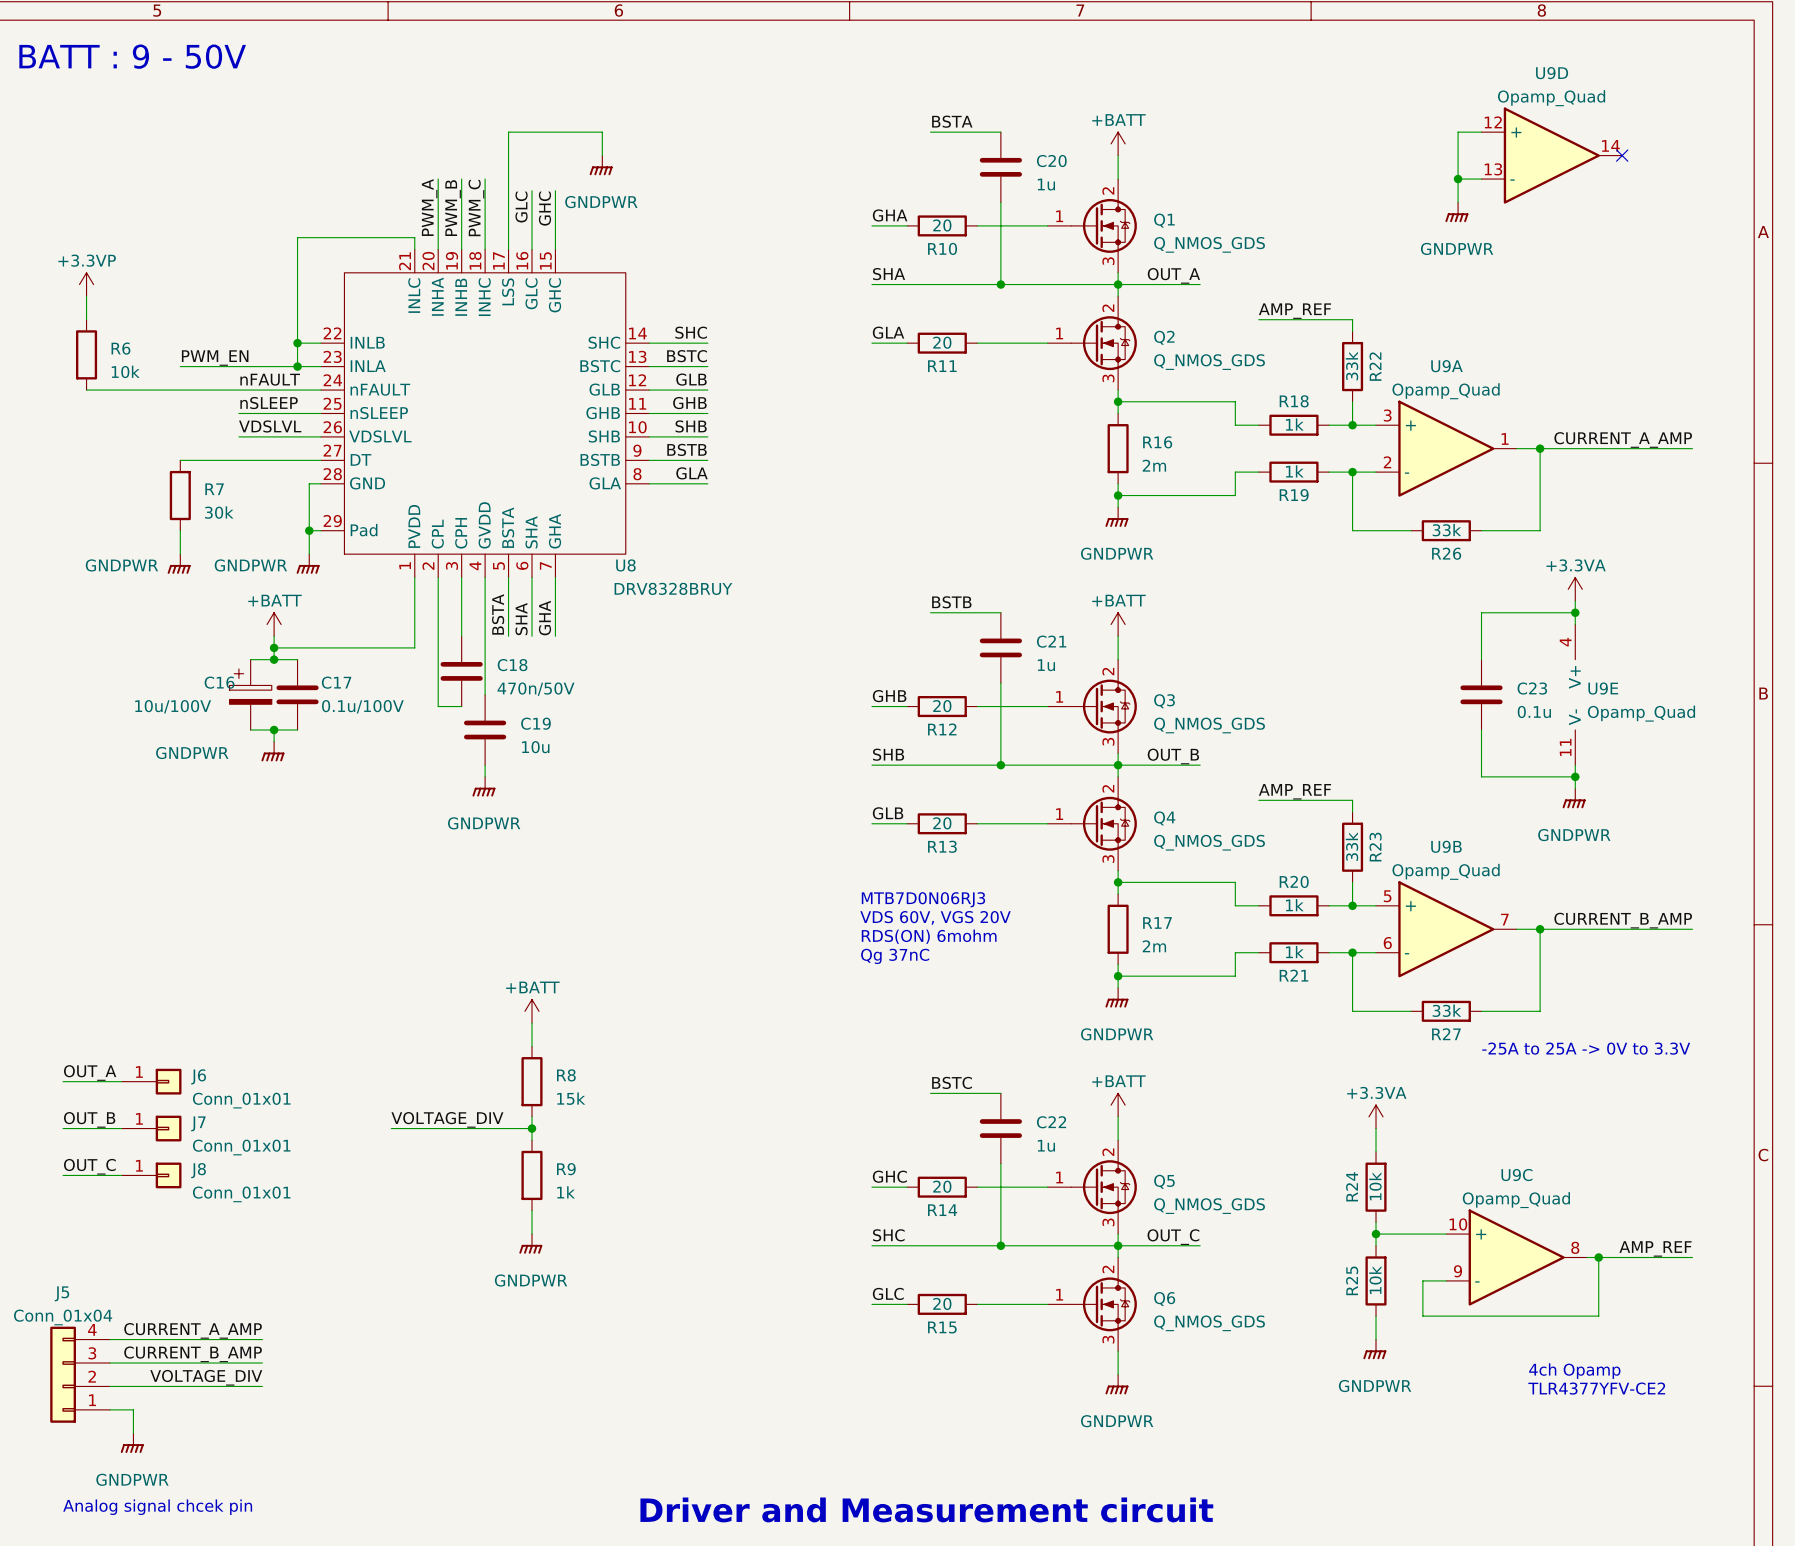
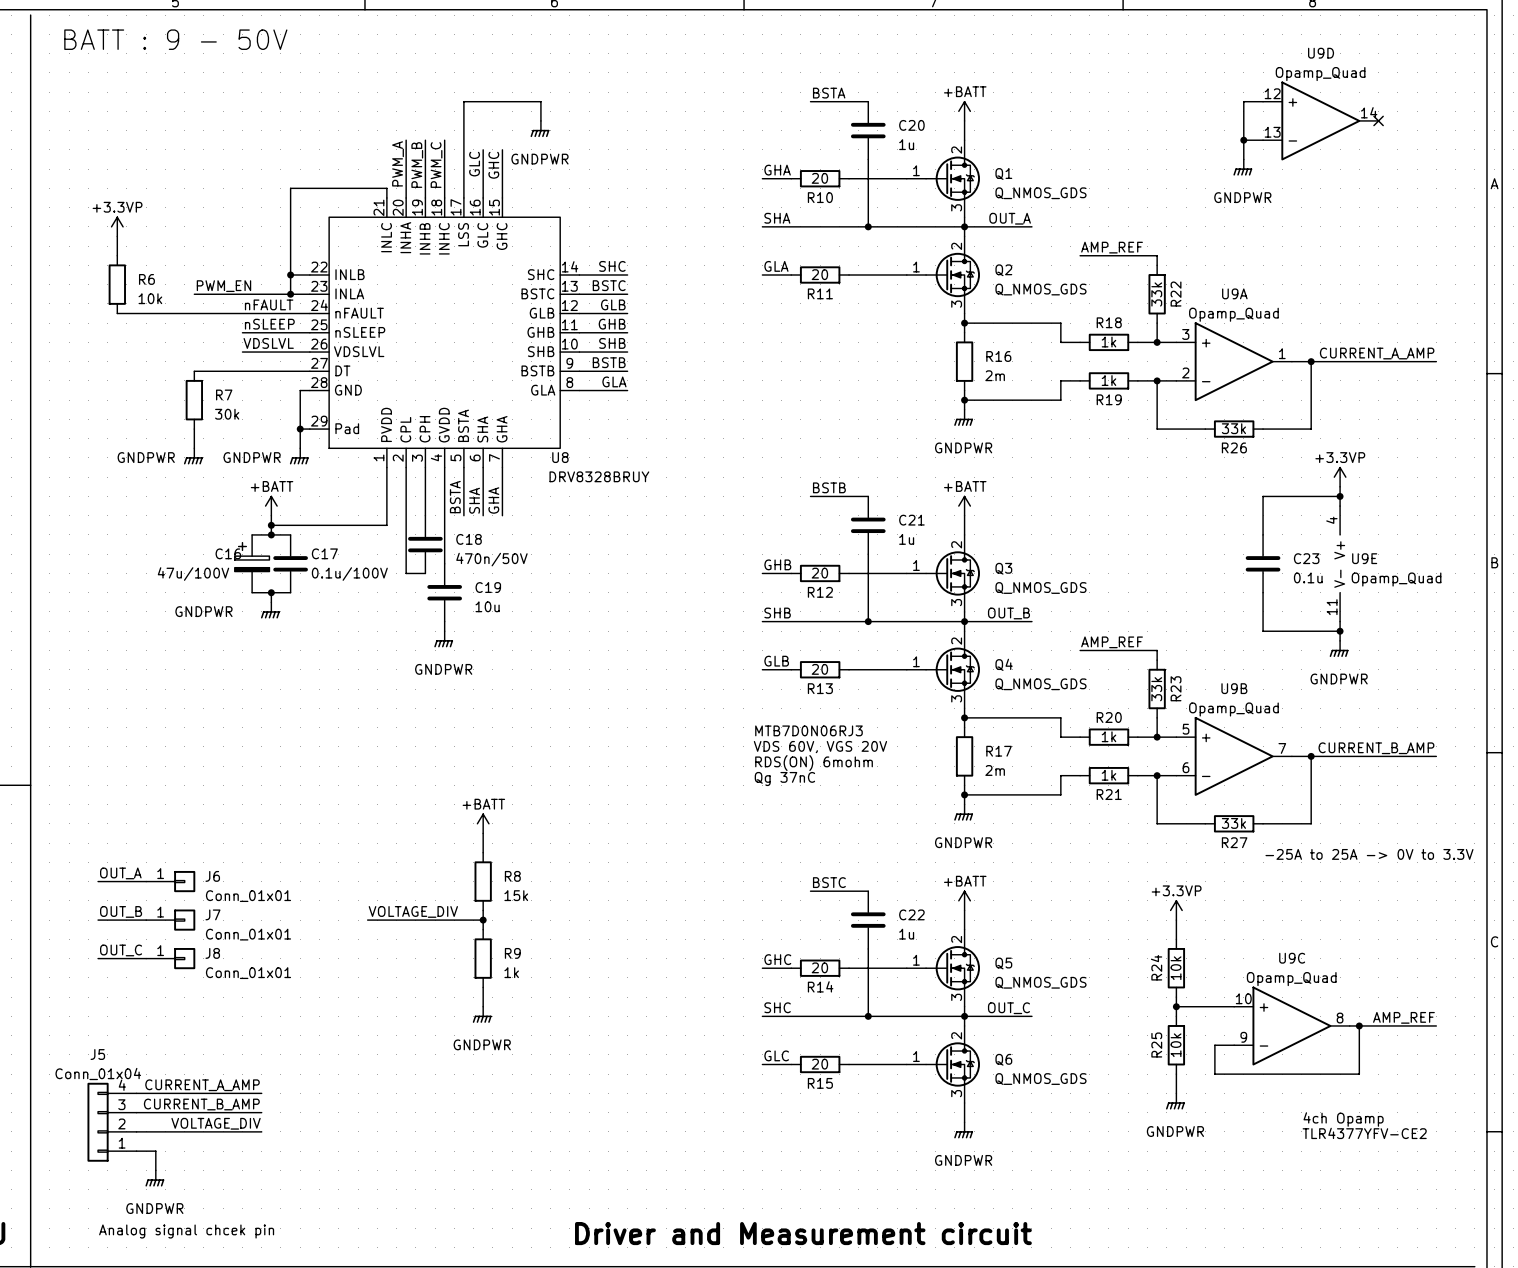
power symbol: +3.3VA (1575, 589) -> +3.3VP (1340, 477)
C16 value: 10u/100V (173, 706) -> 47u/100V (193, 574)
power symbol: +3.3VA (1376, 1116) -> +3.3VP (1176, 910)

